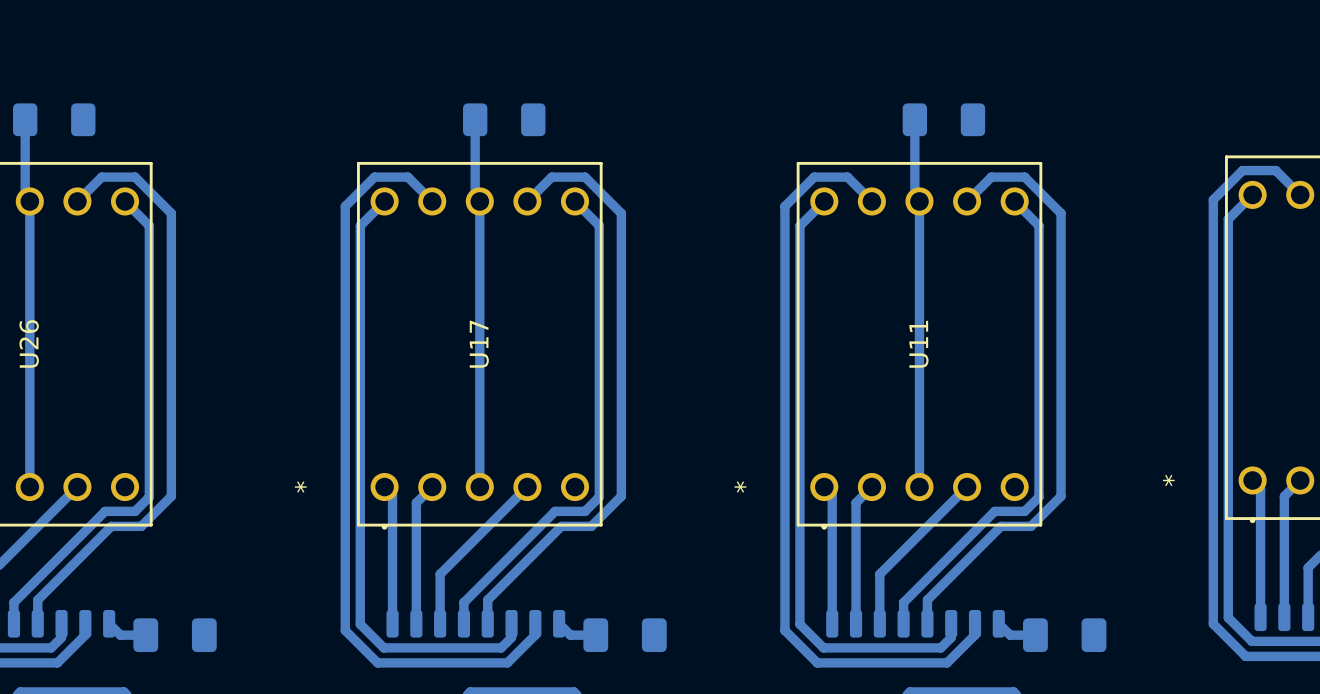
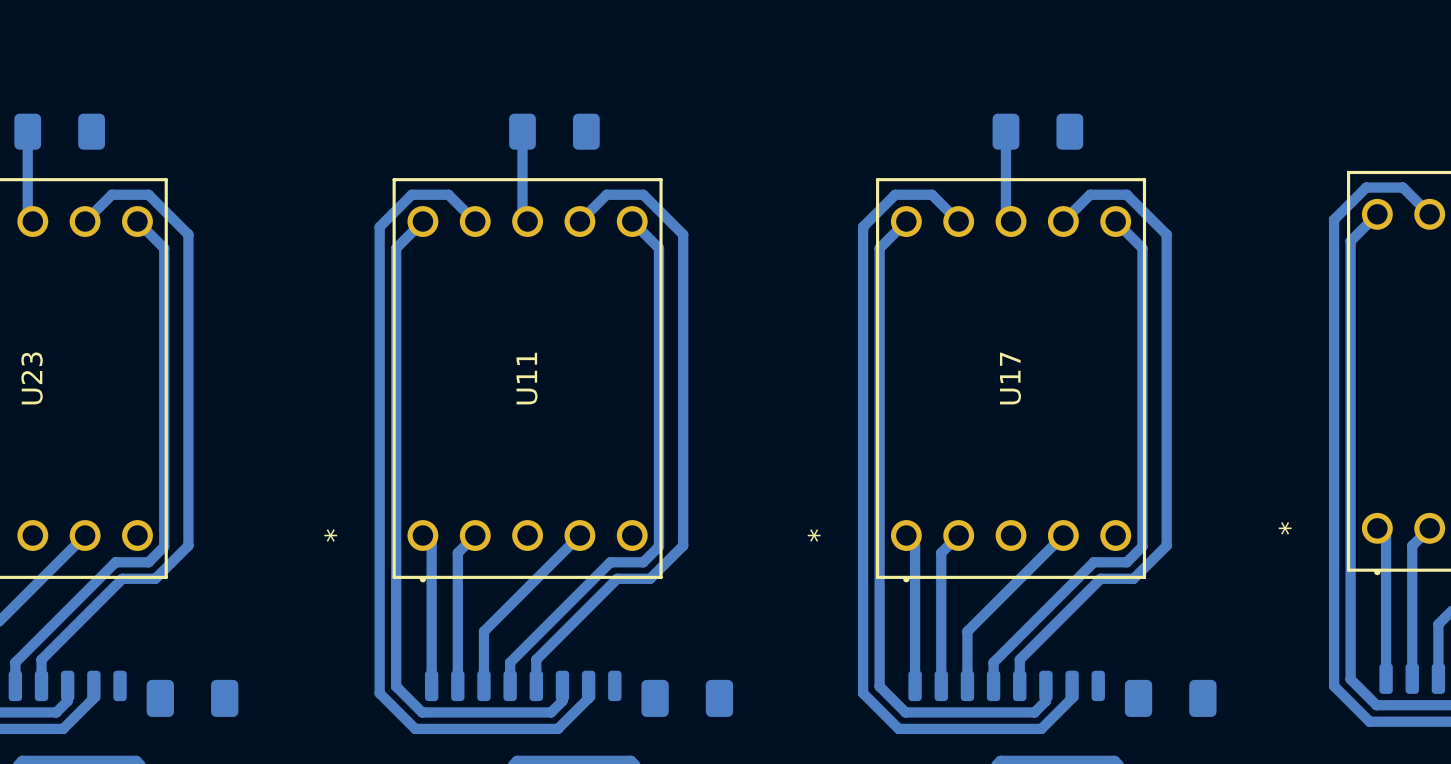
bottom track: (29, 201) (29, 487) -> none
bottom track: (479, 201) (479, 487) -> none
bottom track: (919, 201) (919, 487) -> none
U26 name: U26 (29, 343) -> U23 (32, 378)
U17 name: U17 (479, 344) -> U11 (527, 378)
U11 name: U11 (918, 344) -> U17 (1010, 378)
bottom track: (109, 623) (120, 635) (145, 635) -> none
bottom track: (559, 623) (570, 635) (595, 635) -> none
bottom track: (998, 623) (1010, 635) (1035, 635) -> none

